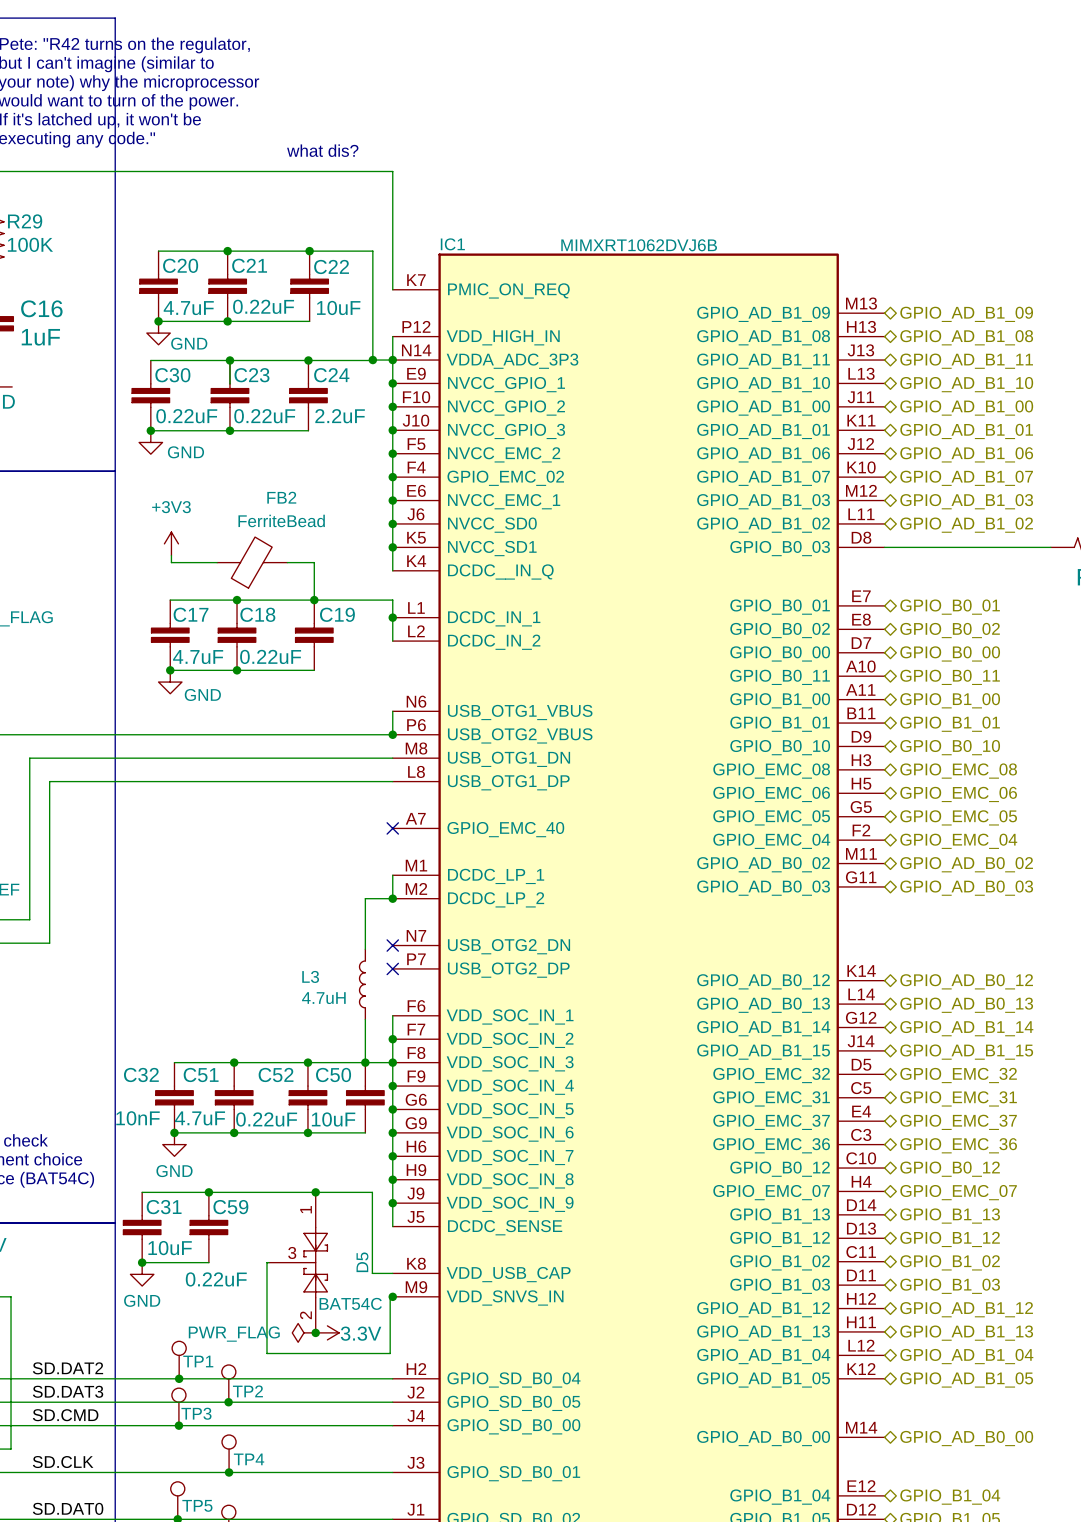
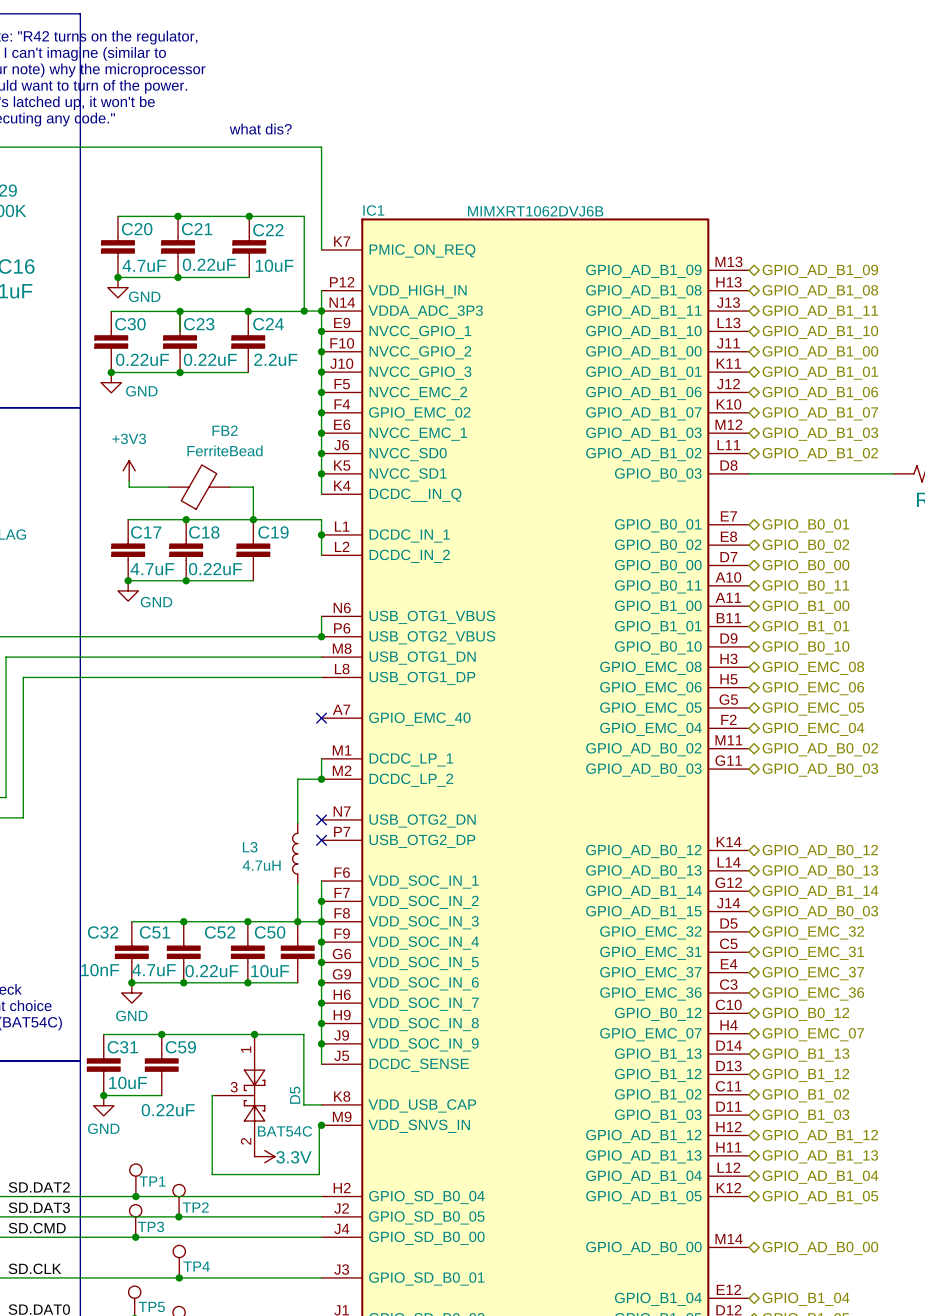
hierarchical label: GPIO_AD_B1_15 (966, 1052) -> GPIO_AD_B0_03 (820, 912)
power symbol: PWR_FLAG (303, 1332) -> none
junction: (315, 1332) -> none

